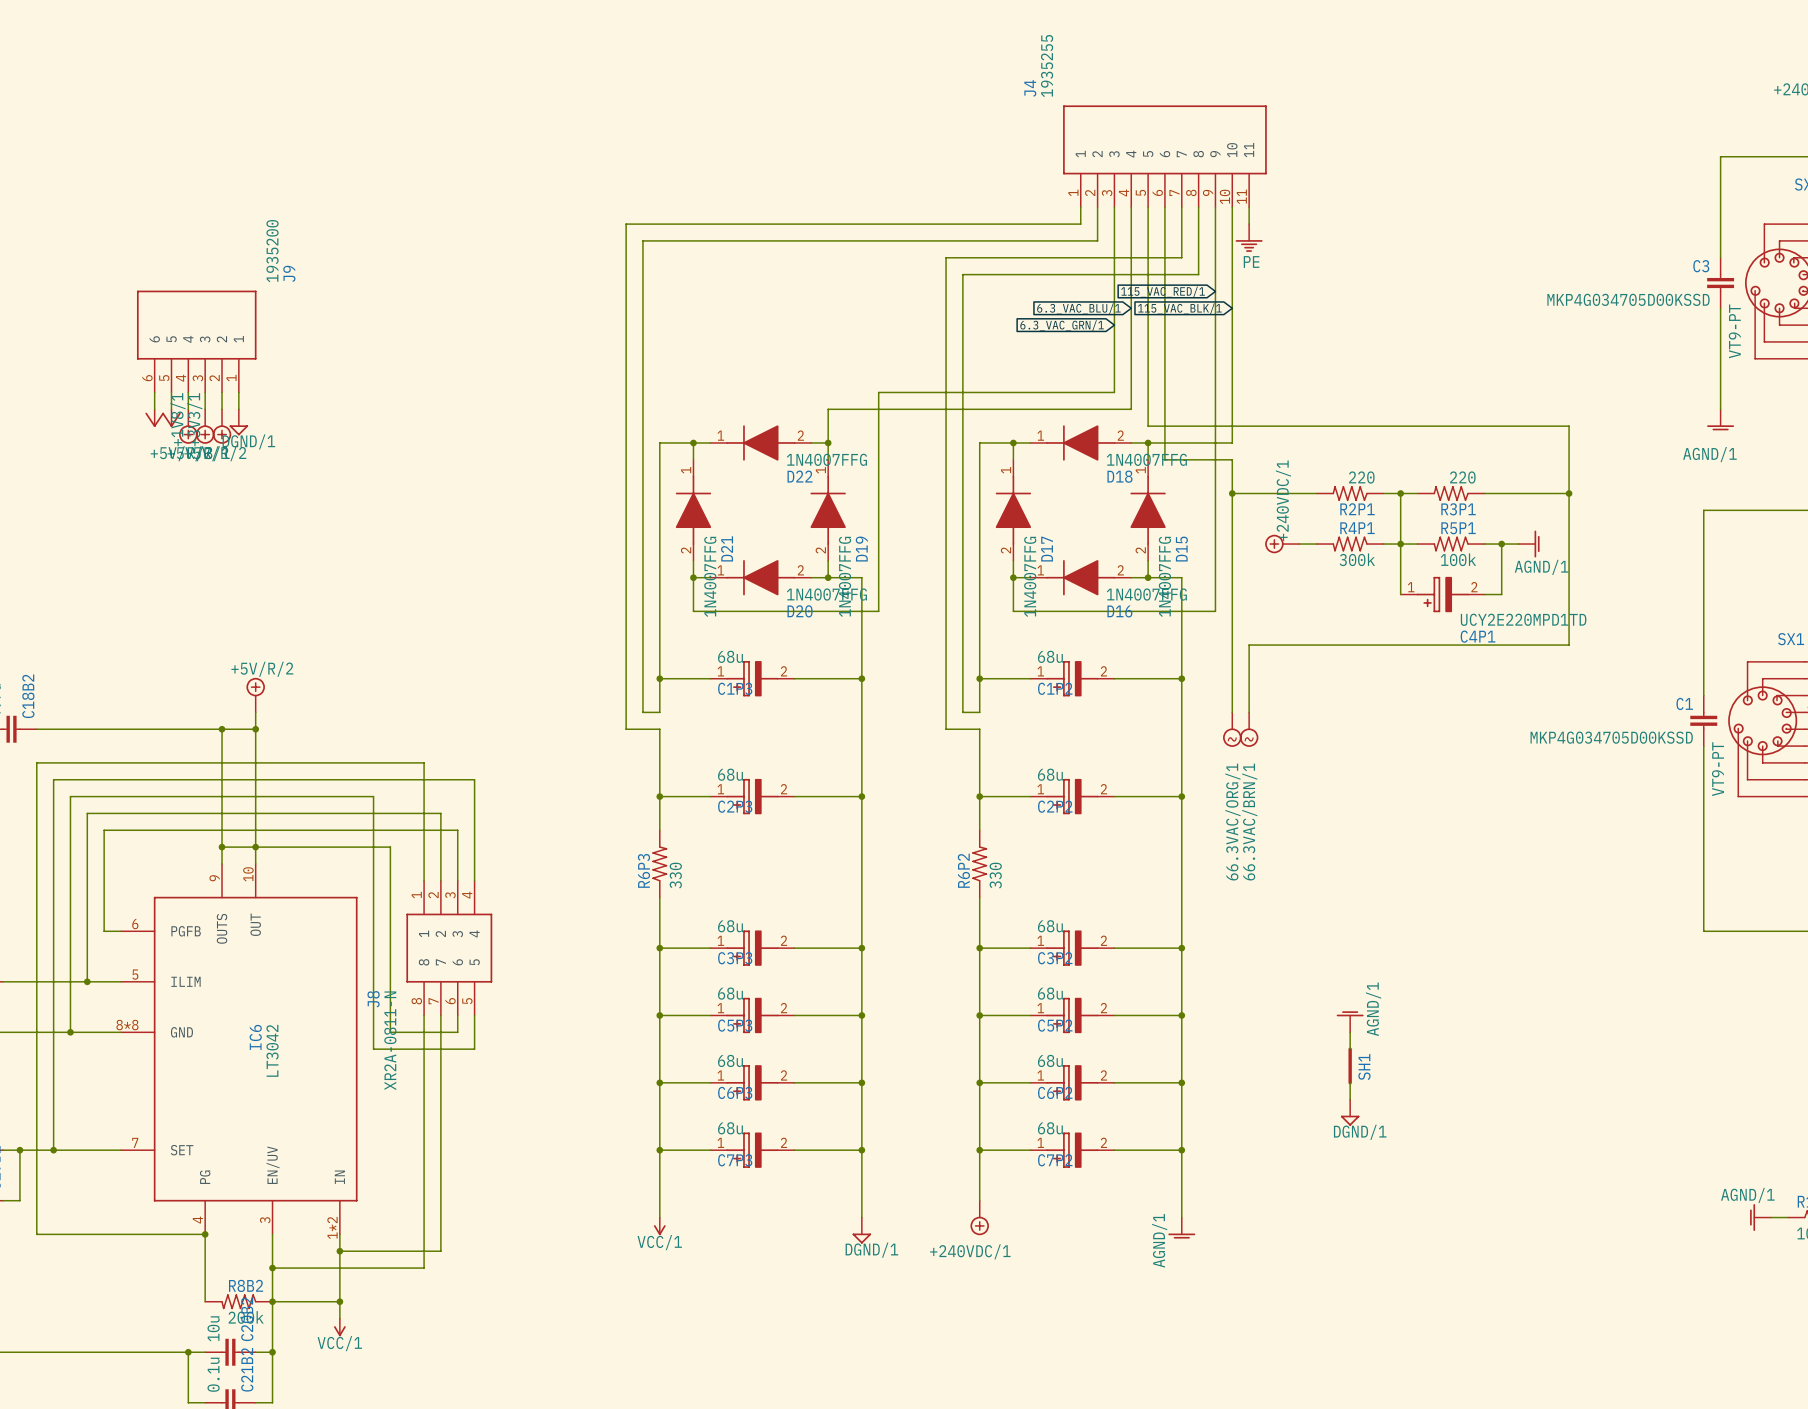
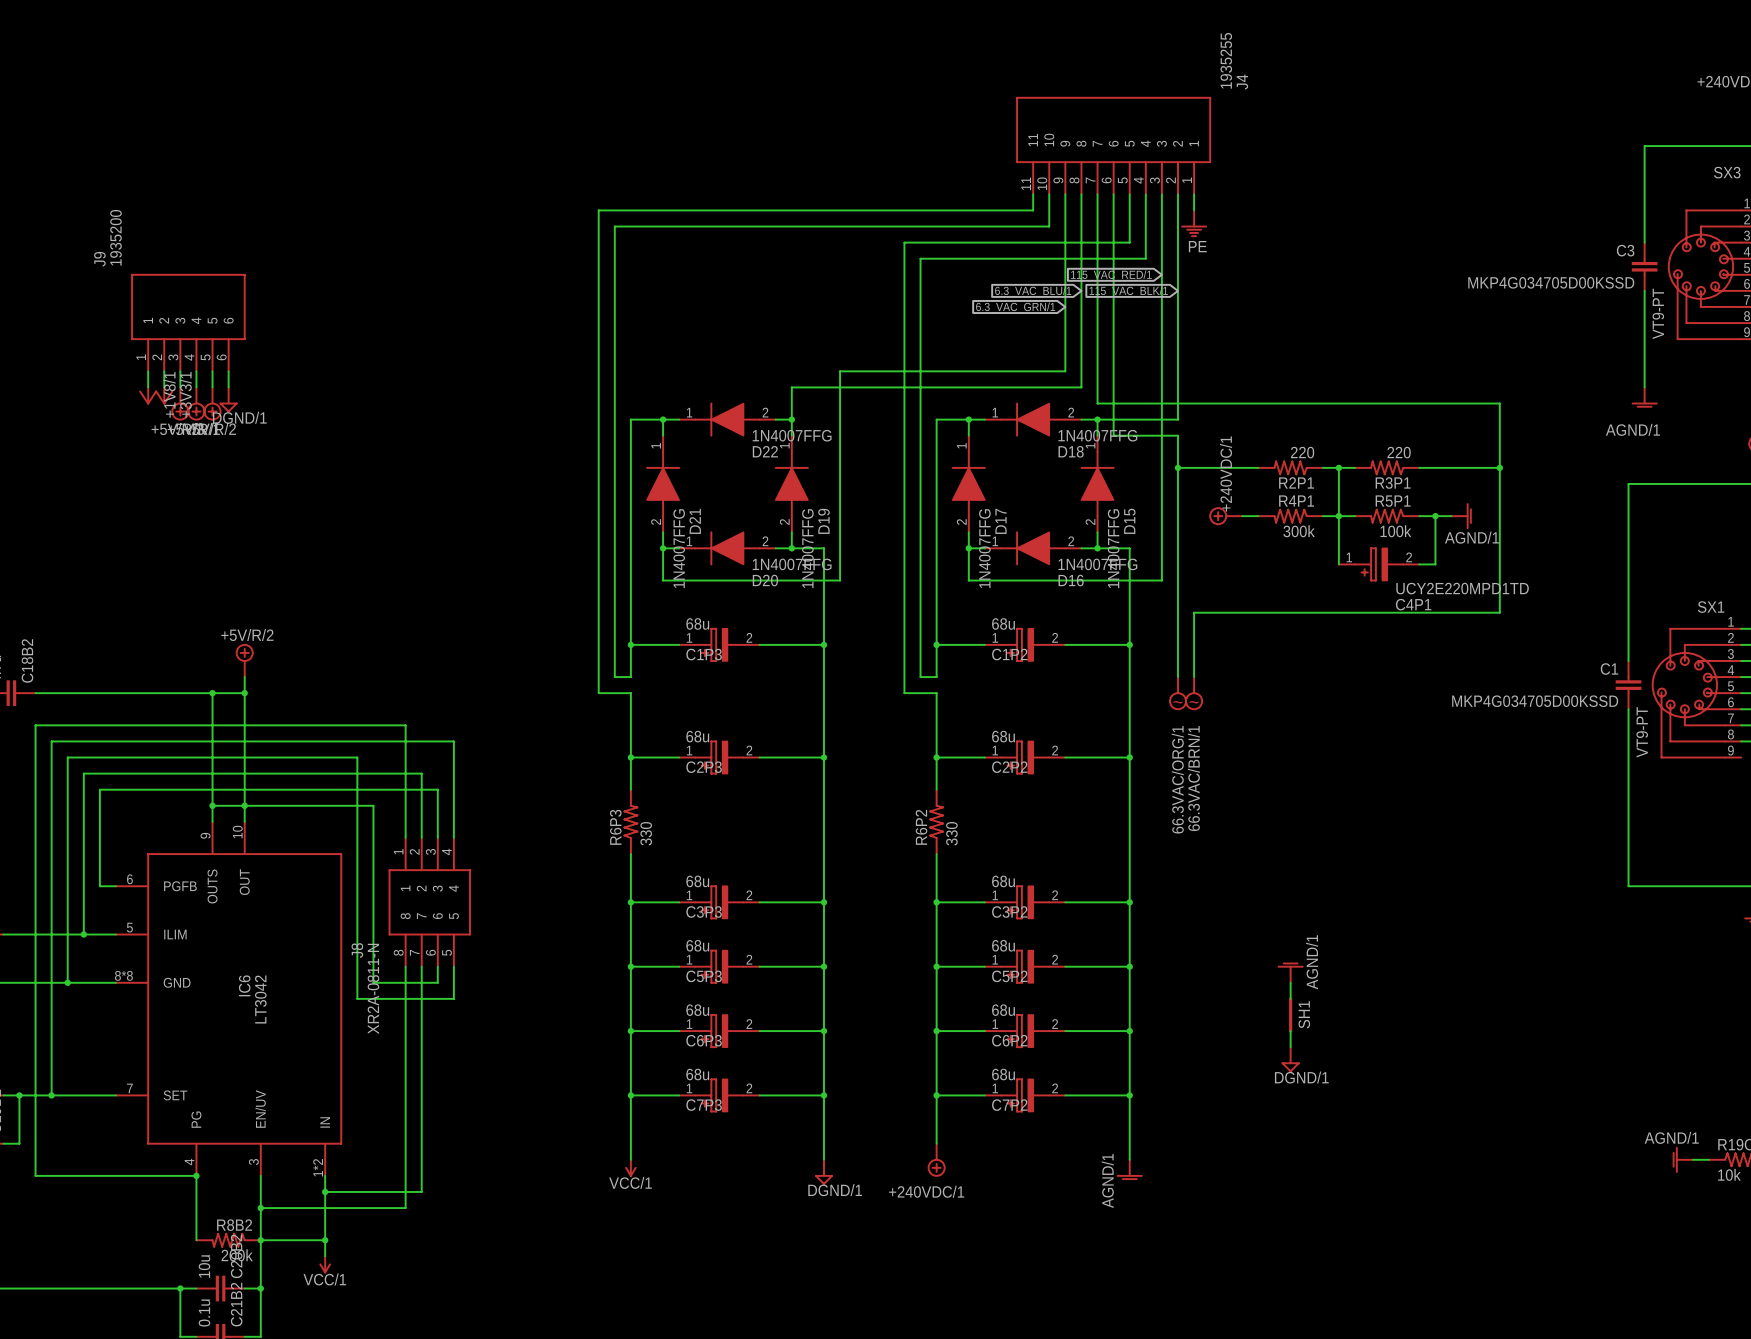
J4 flip: as is (1164, 139) -> left-right (1113, 129)
J9 flip: as is (196, 325) -> left-right (188, 306)

